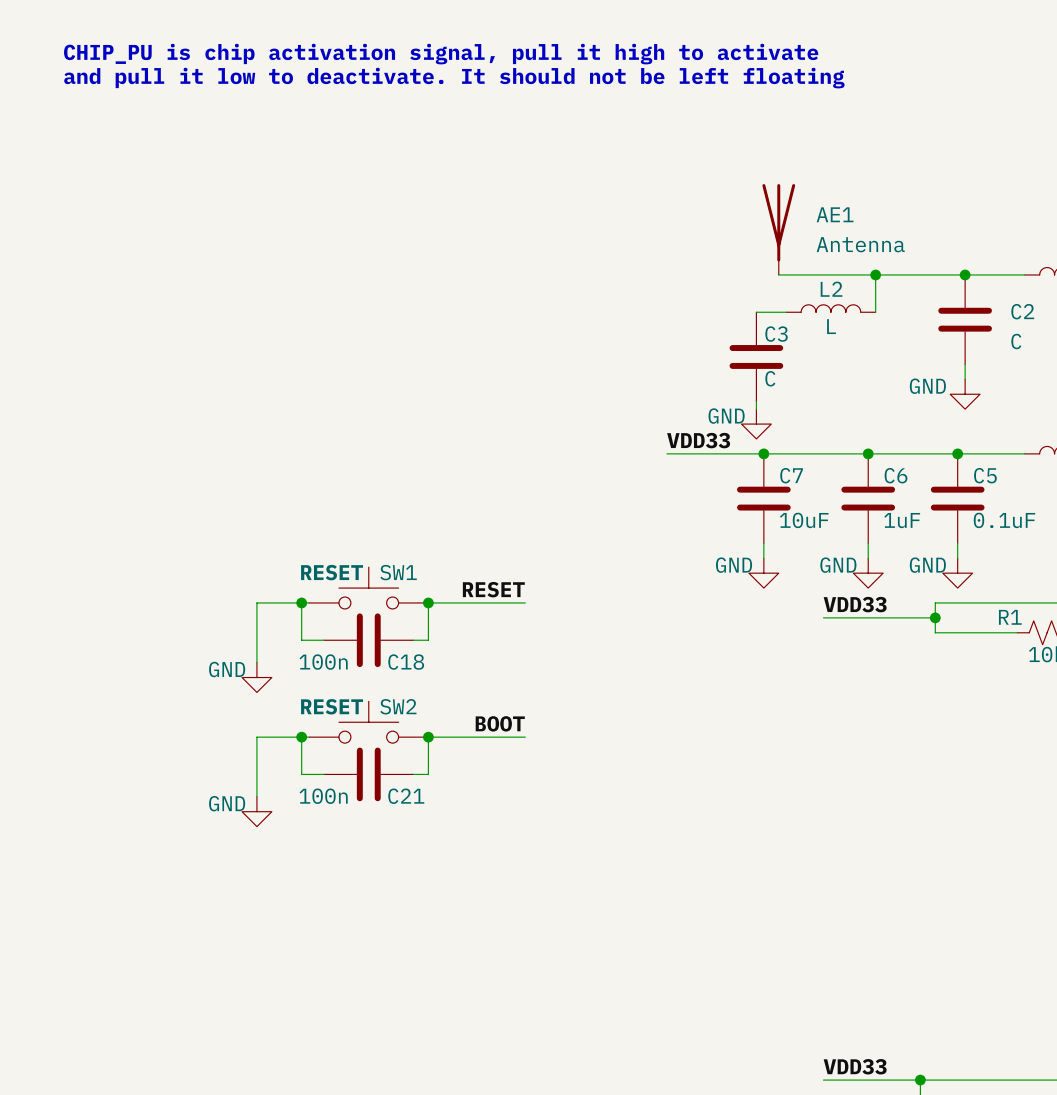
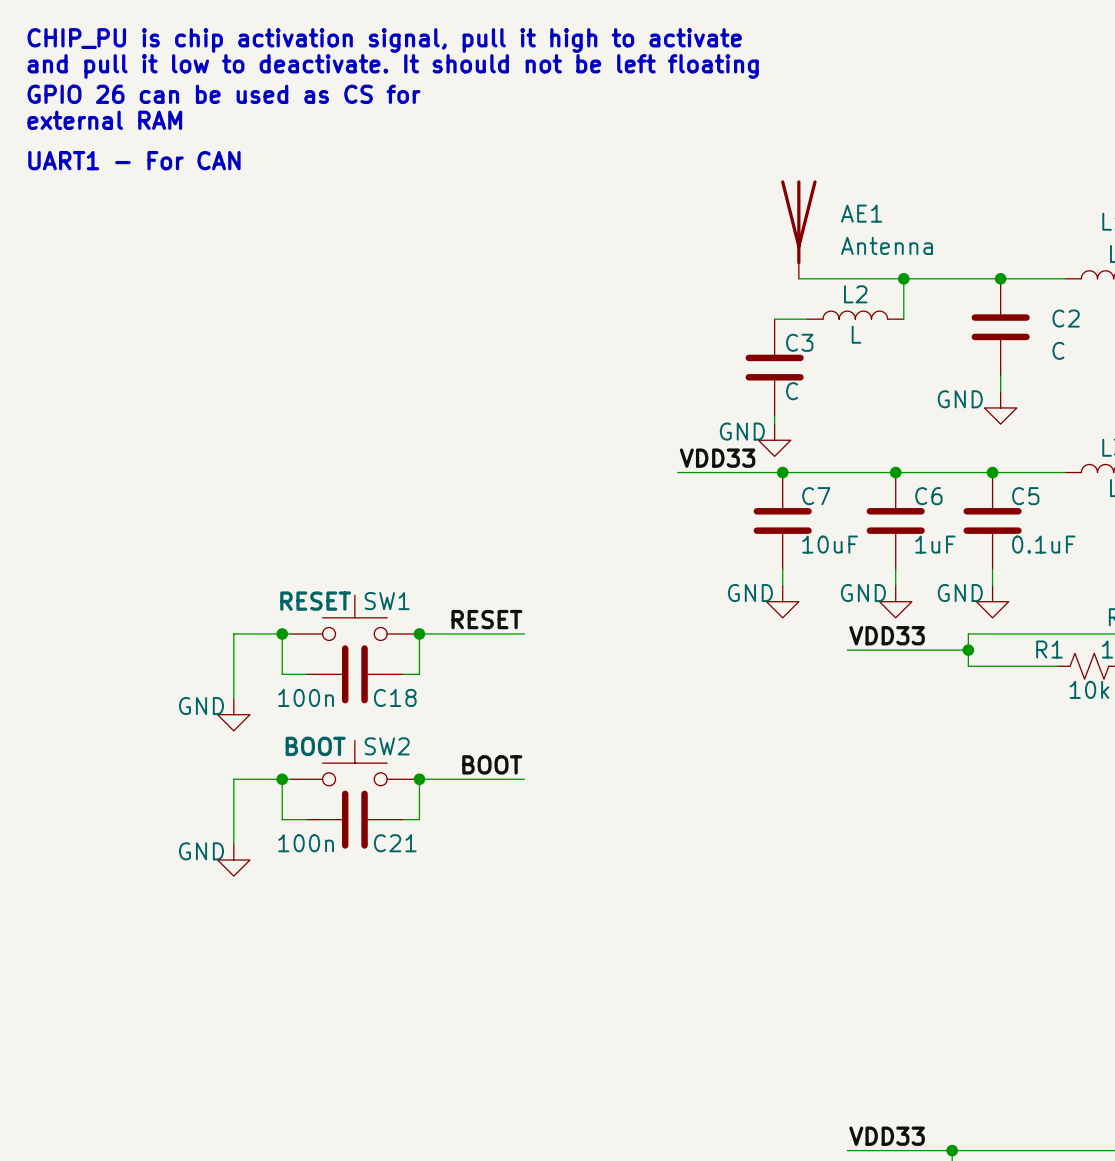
text: none -> GPIO 26 can be used as CS for (224, 94)
text: none -> external RAM (104, 120)
text: none -> UART1 - For CAN (134, 160)
SW2 value: RESET (332, 706) -> BOOT (315, 746)

